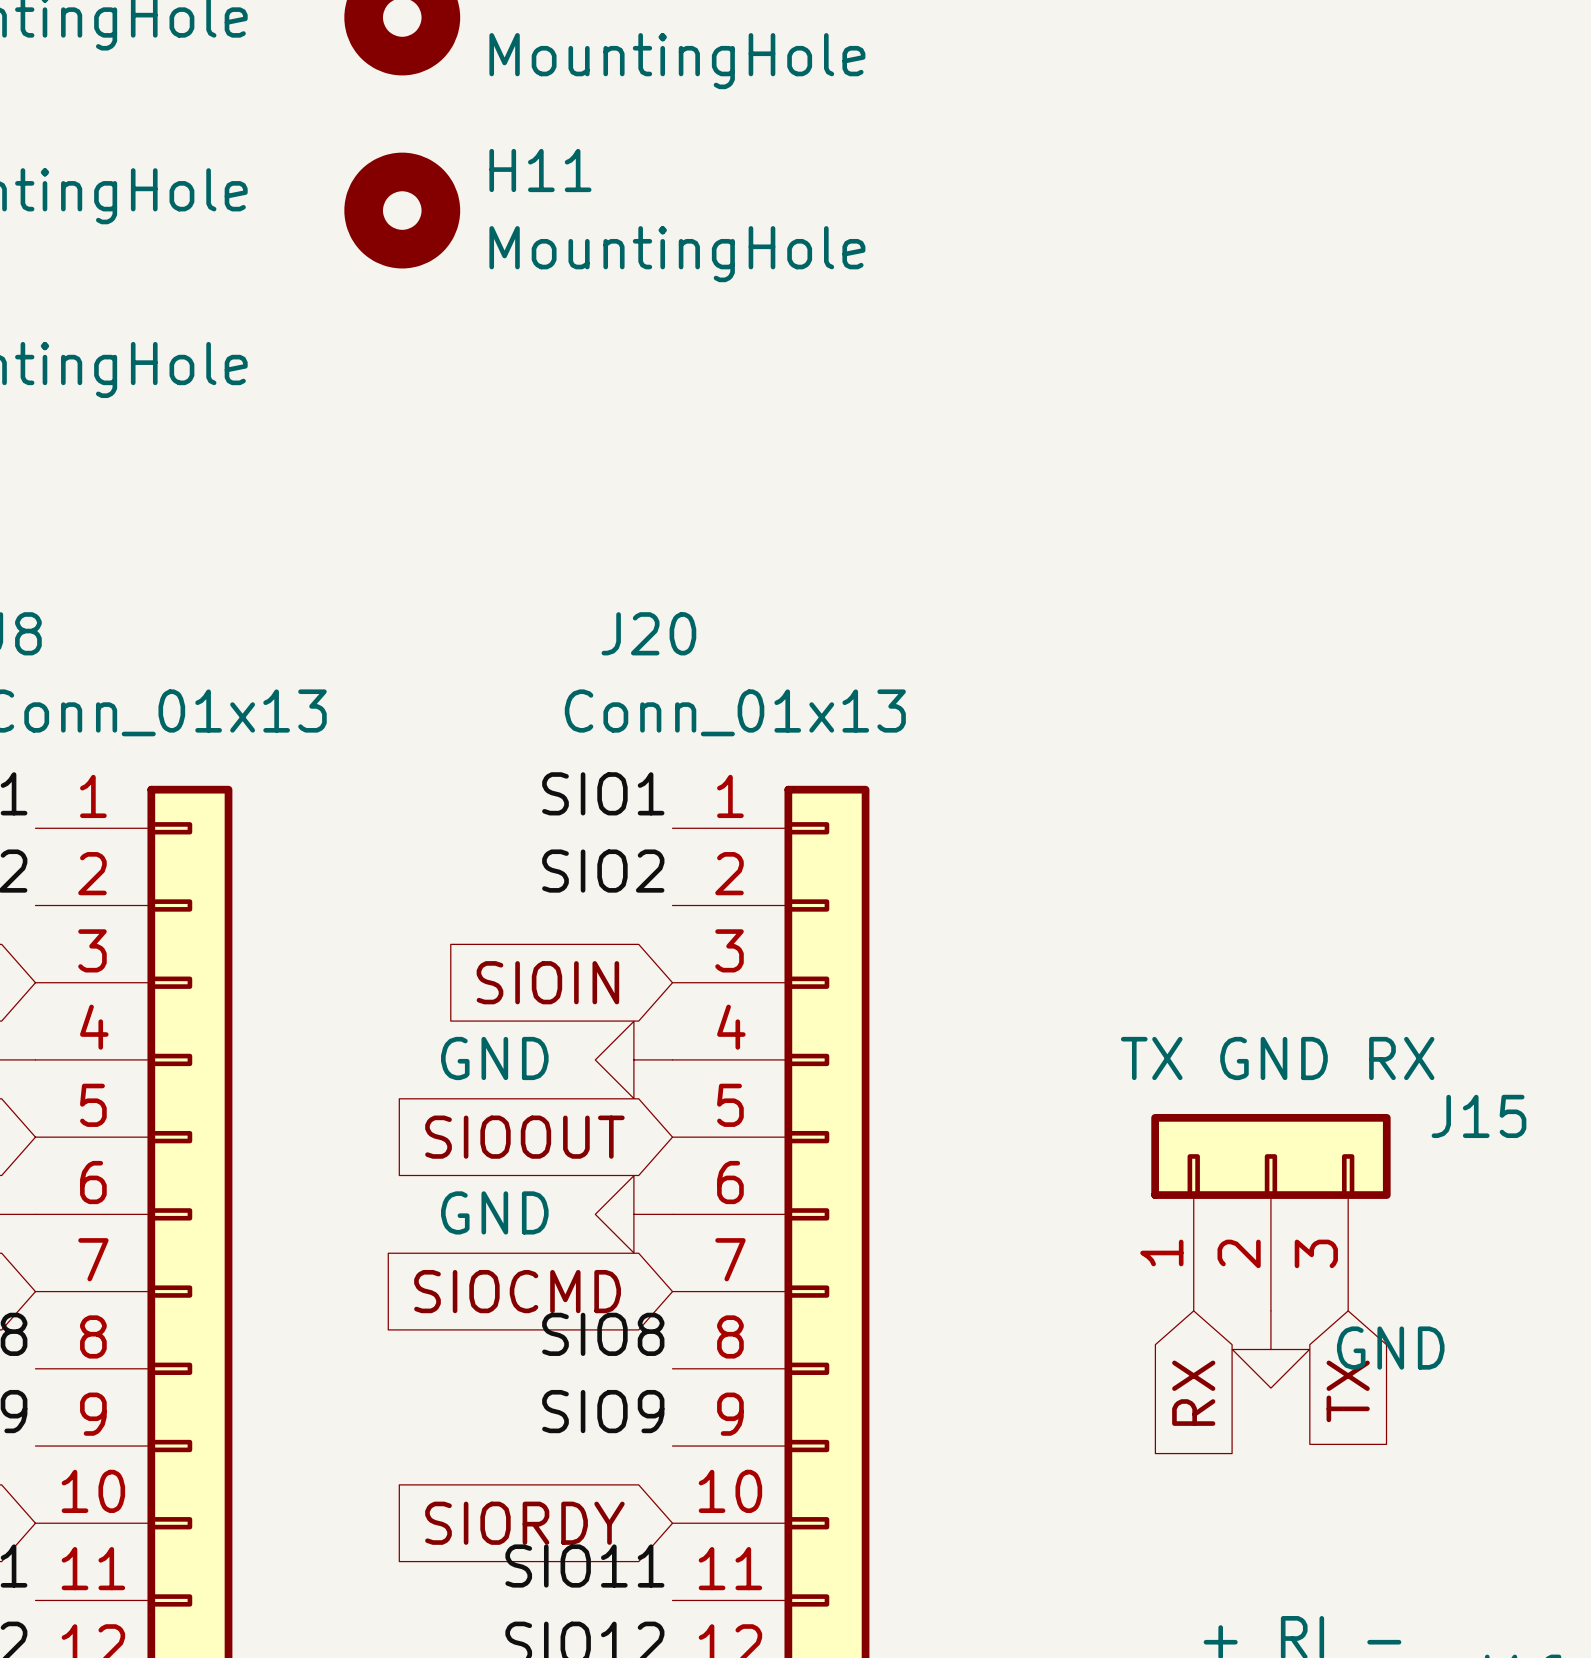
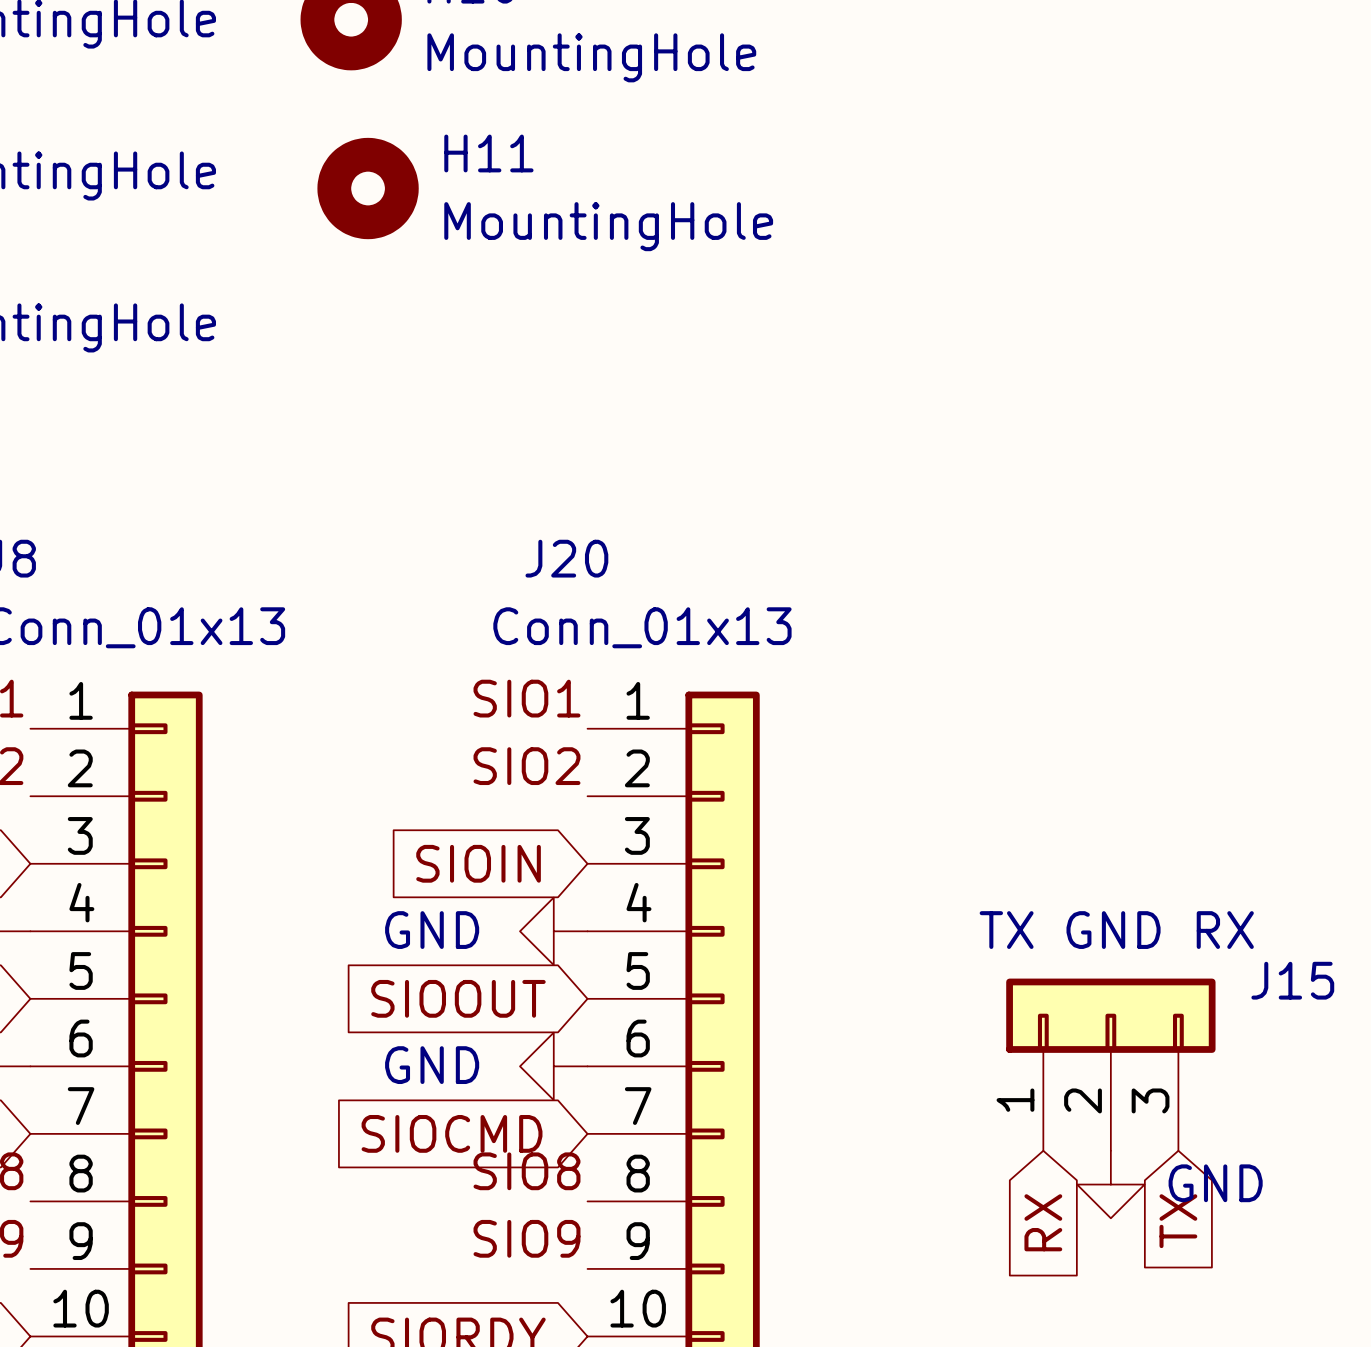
H11 position: (402, 210) -> (368, 188)

